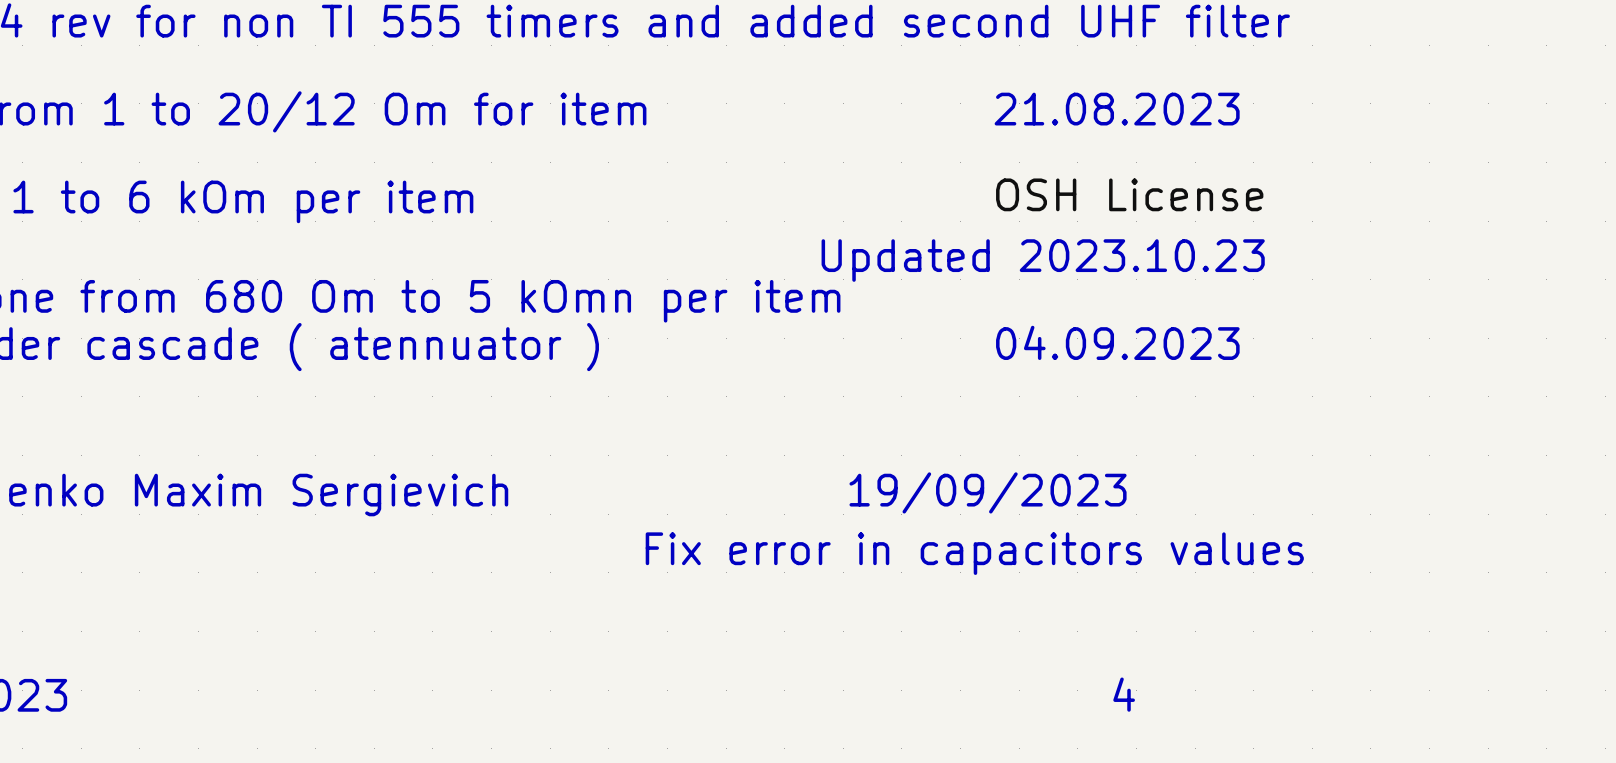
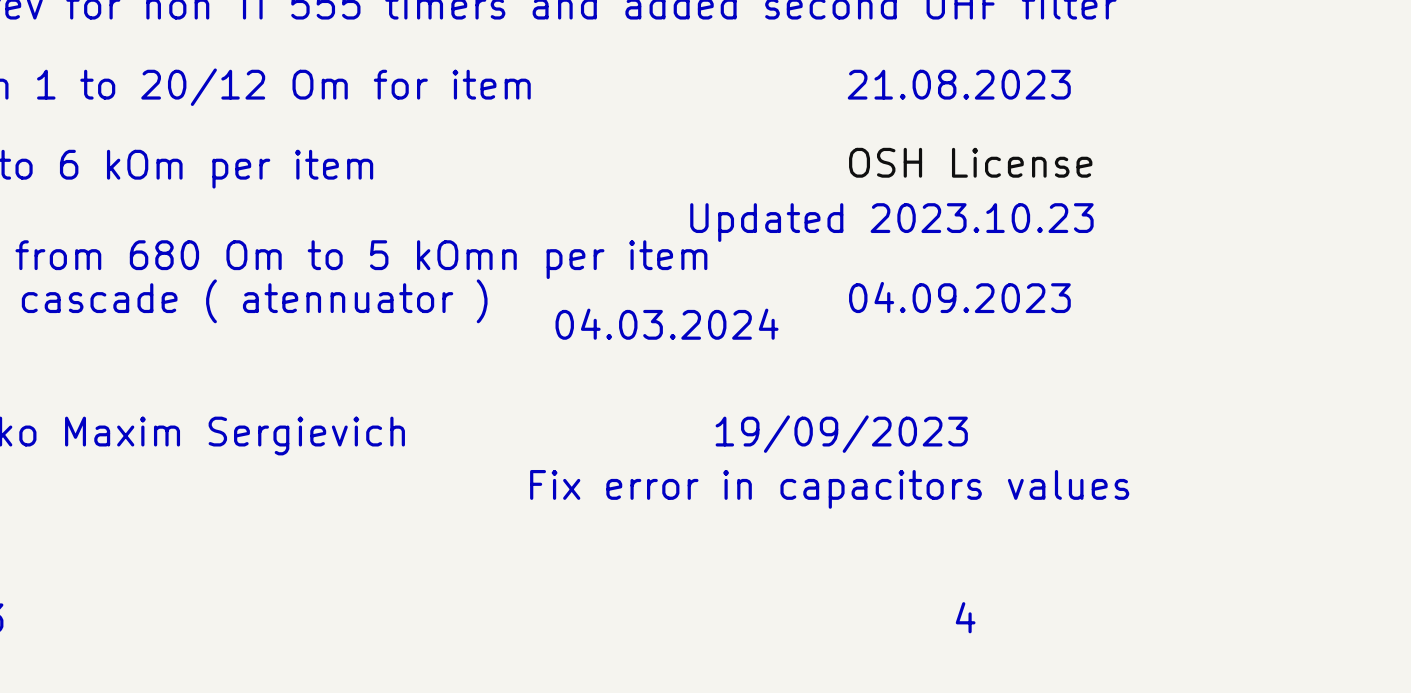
text: none -> 04.03.2024 (667, 324)

